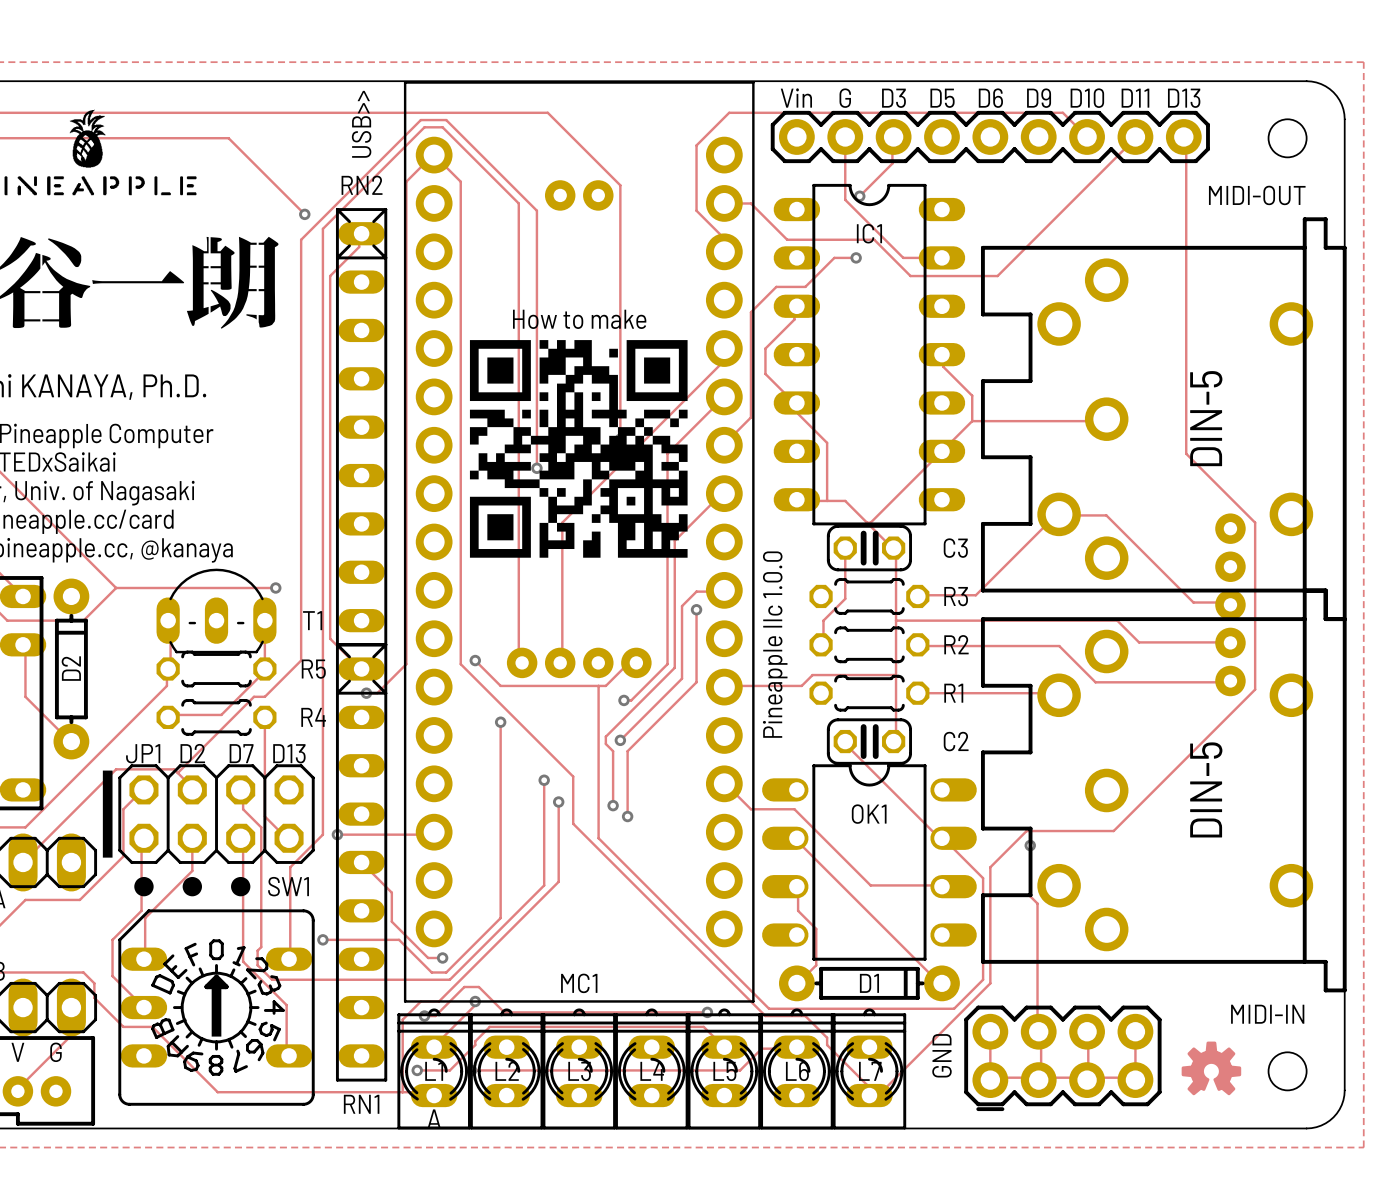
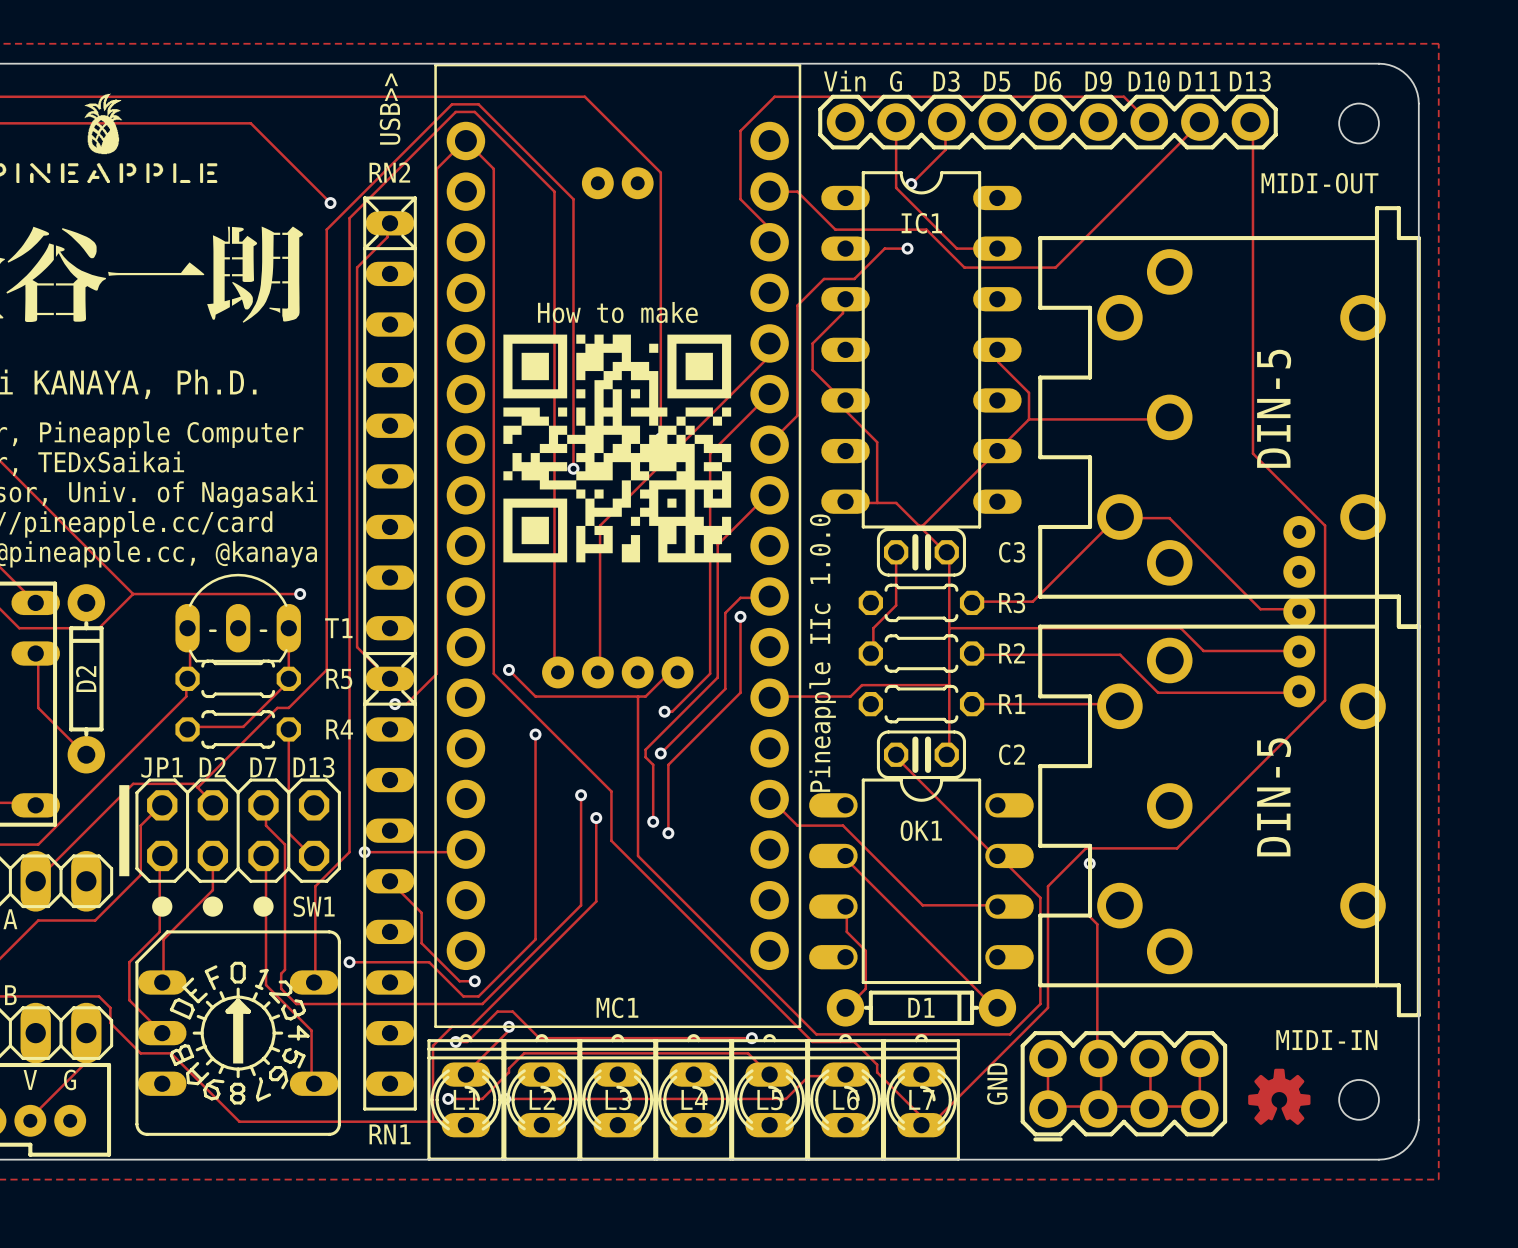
text: A (434, 1118) -> none

